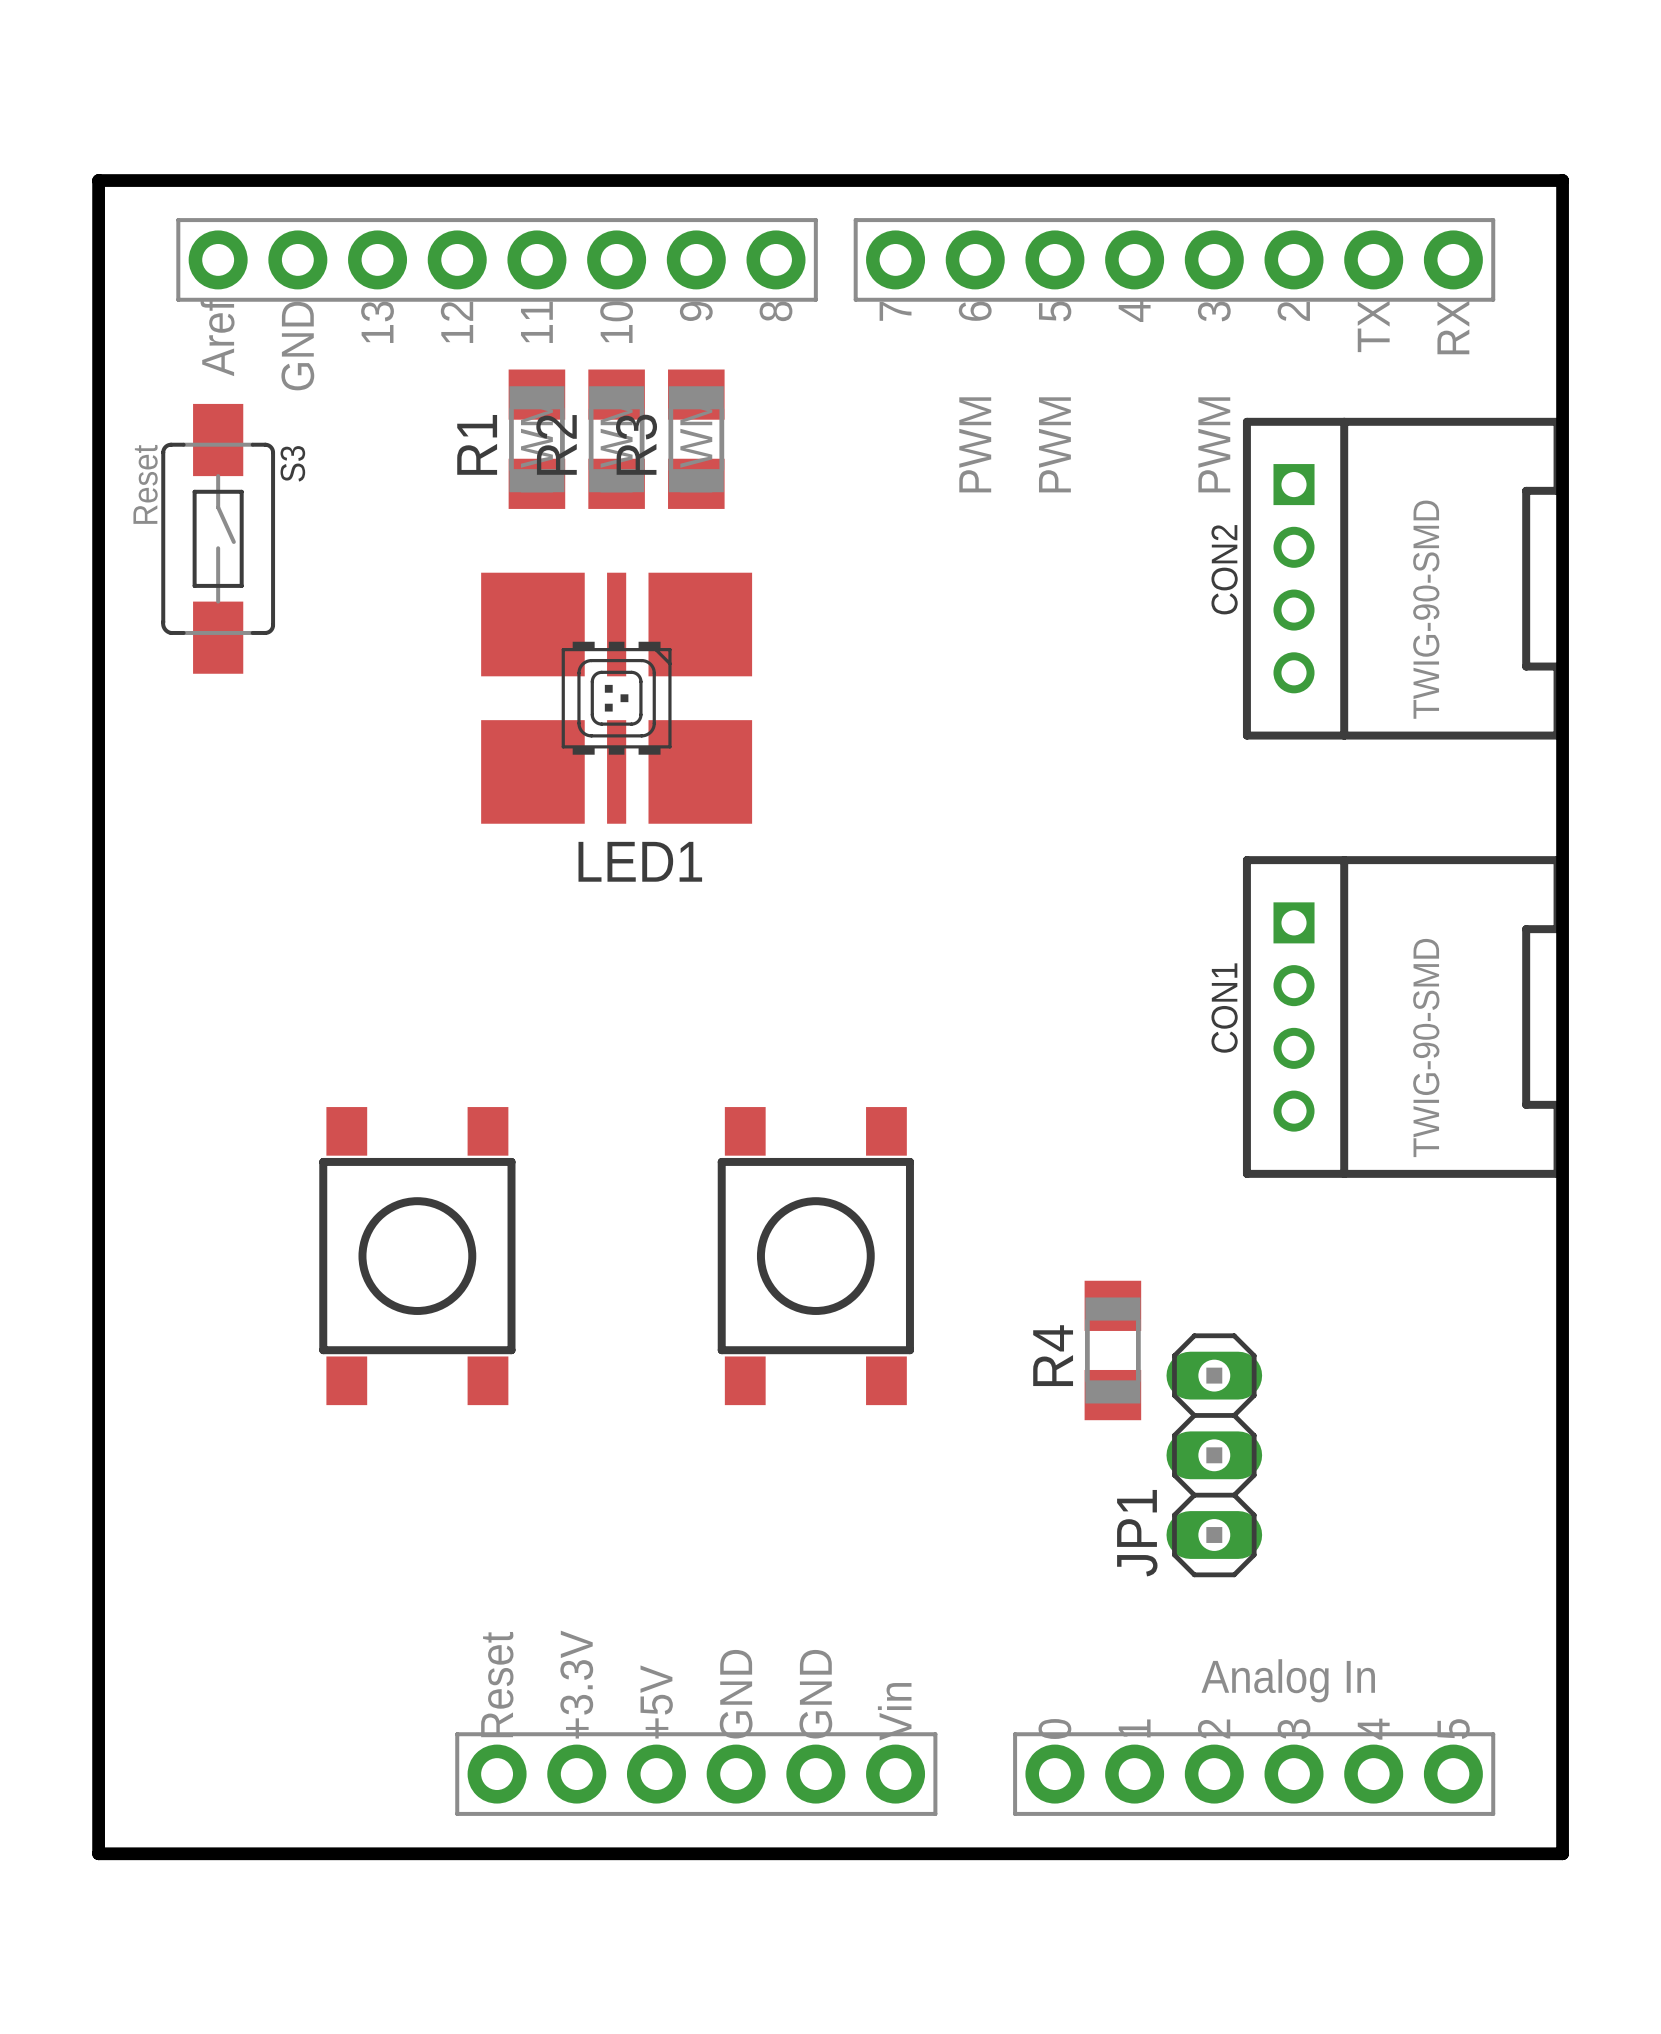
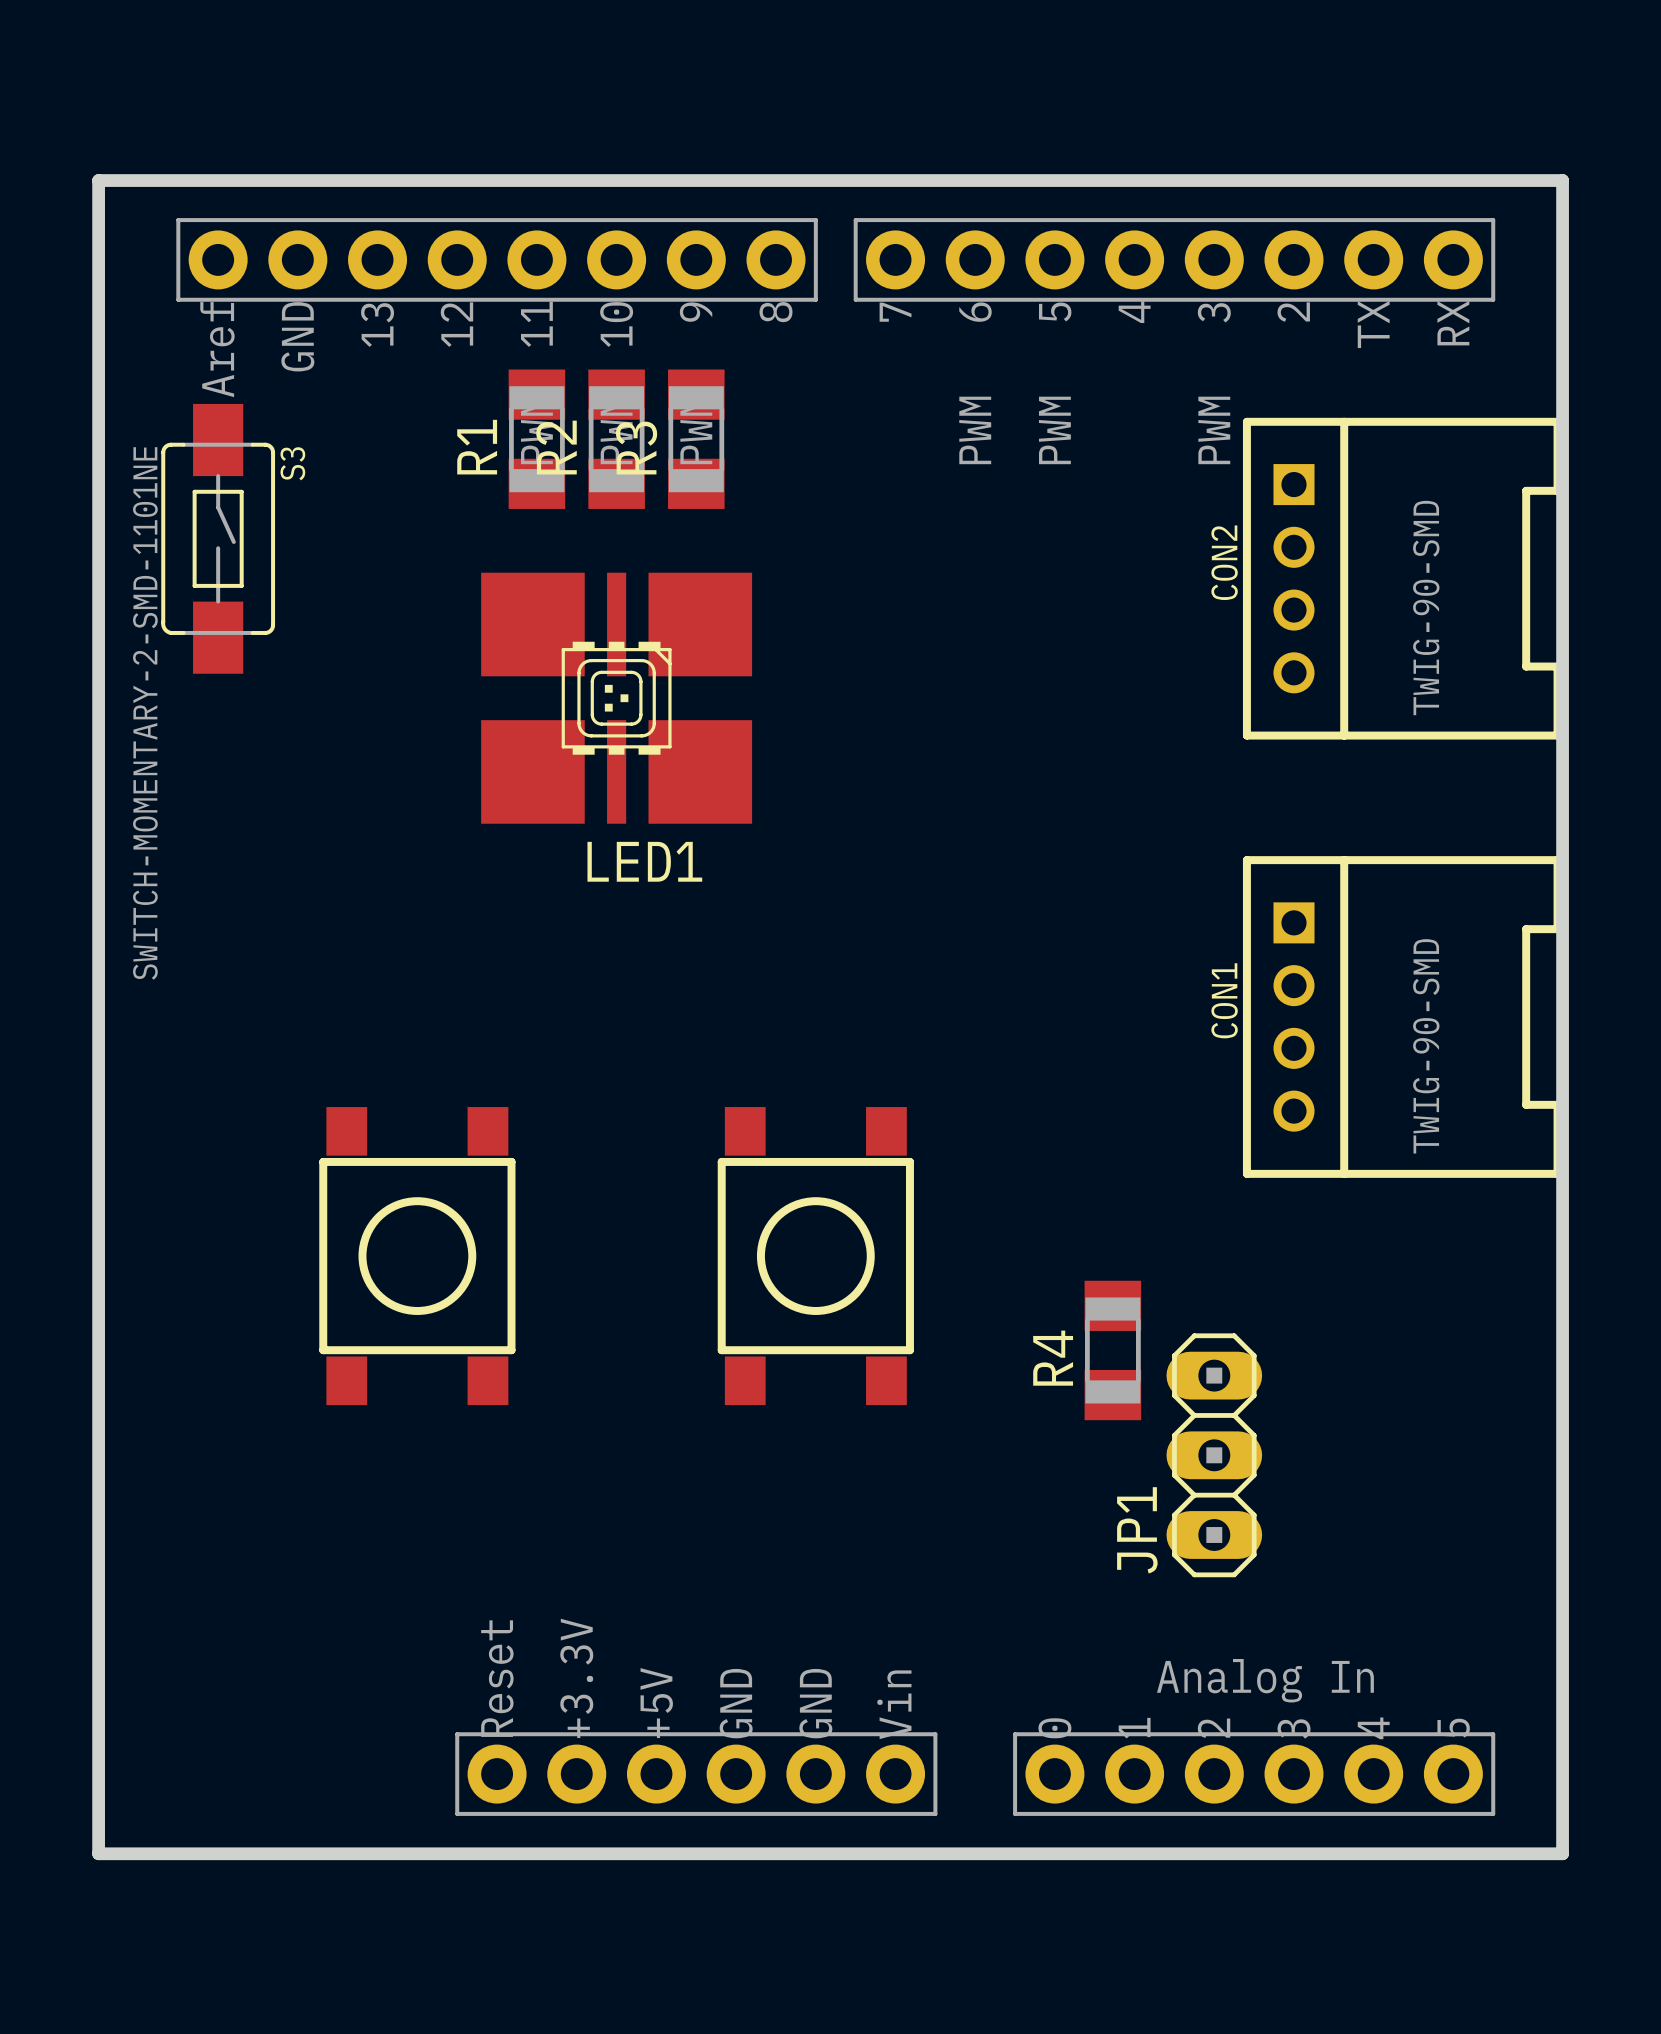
S3 value: Reset (145, 484) -> SWITCH-MOMENTARY-2-SMD-1101NE (145, 713)

